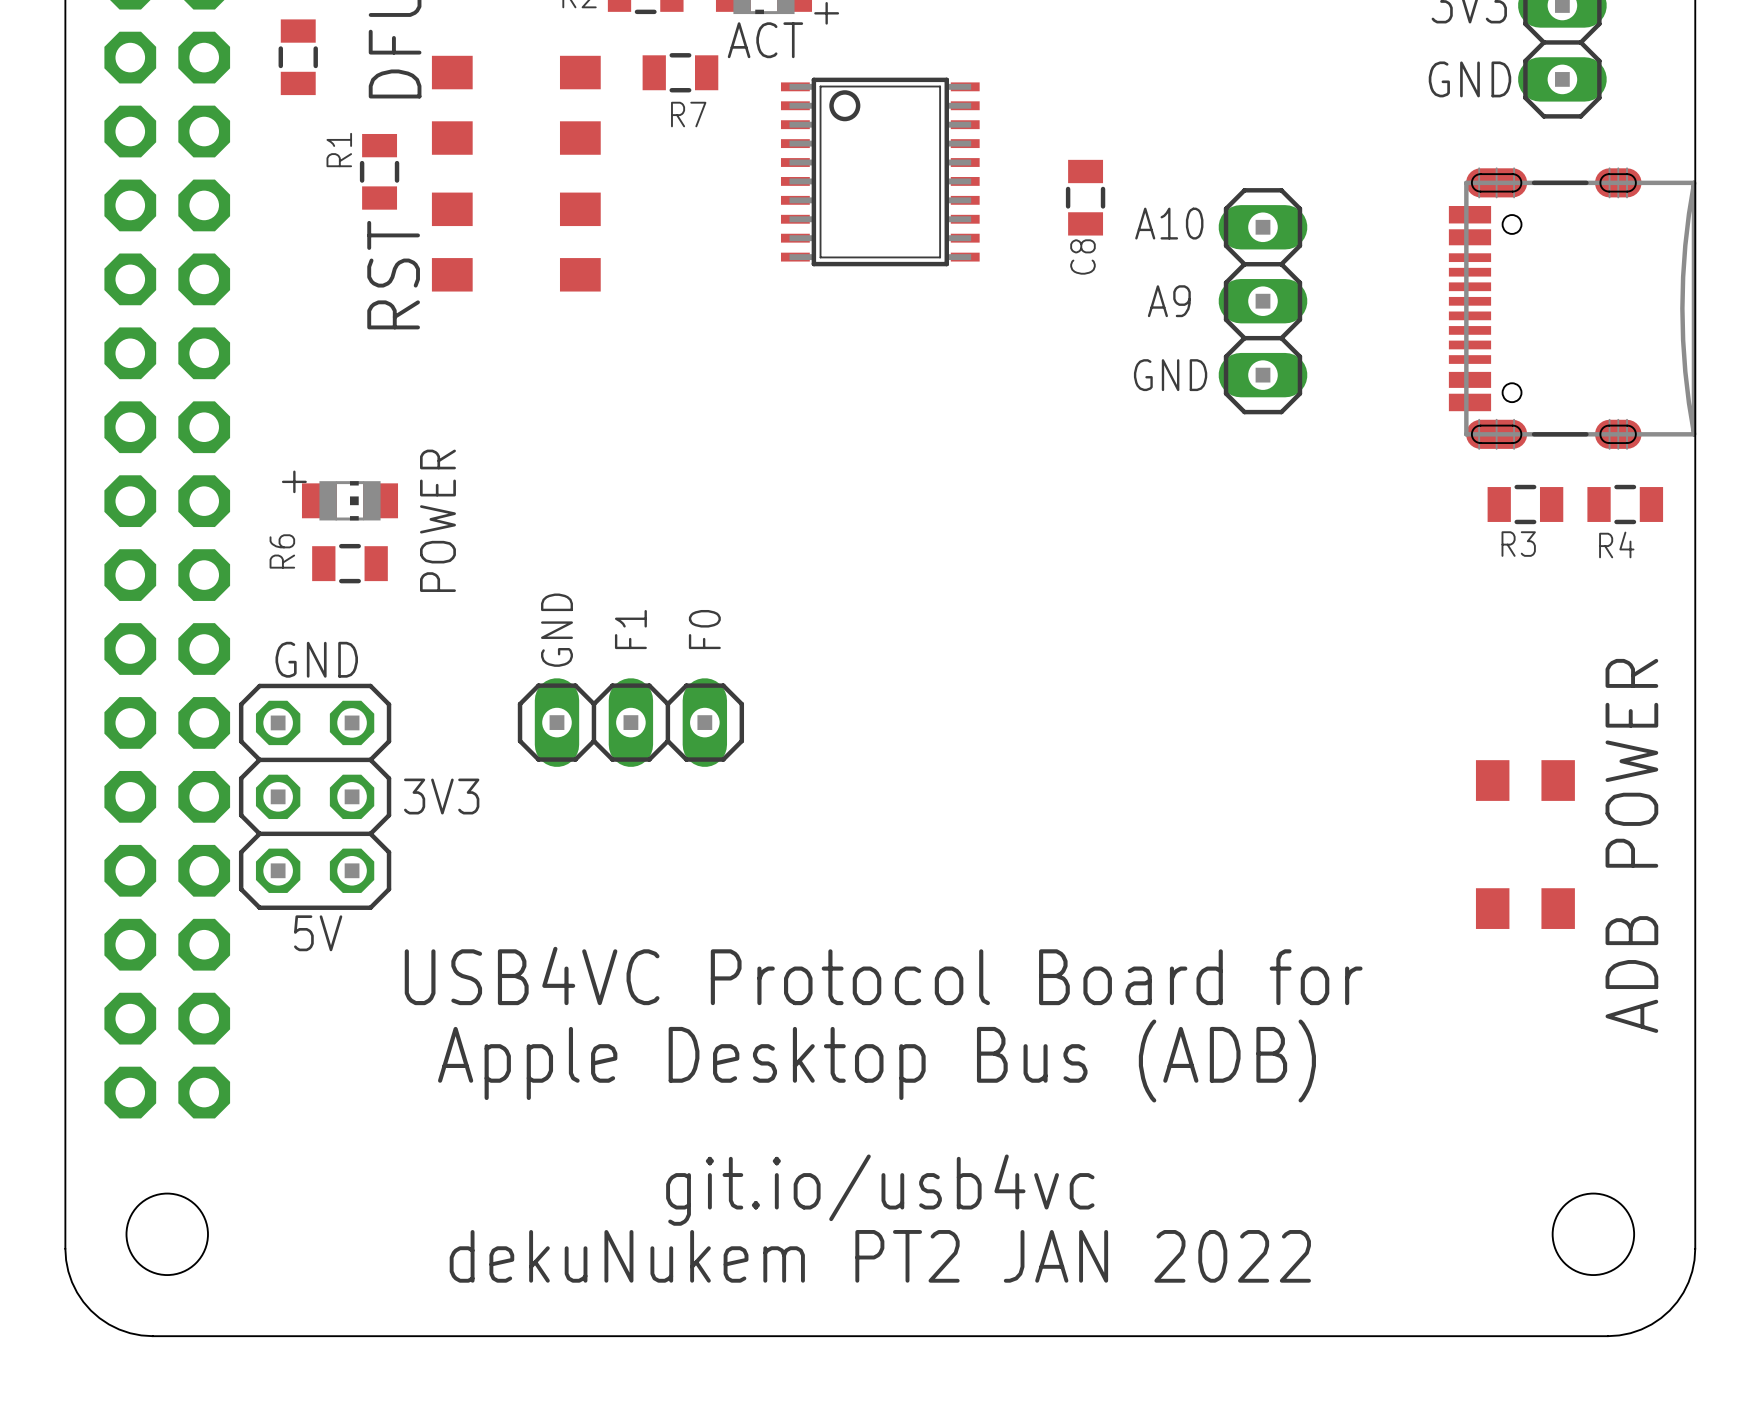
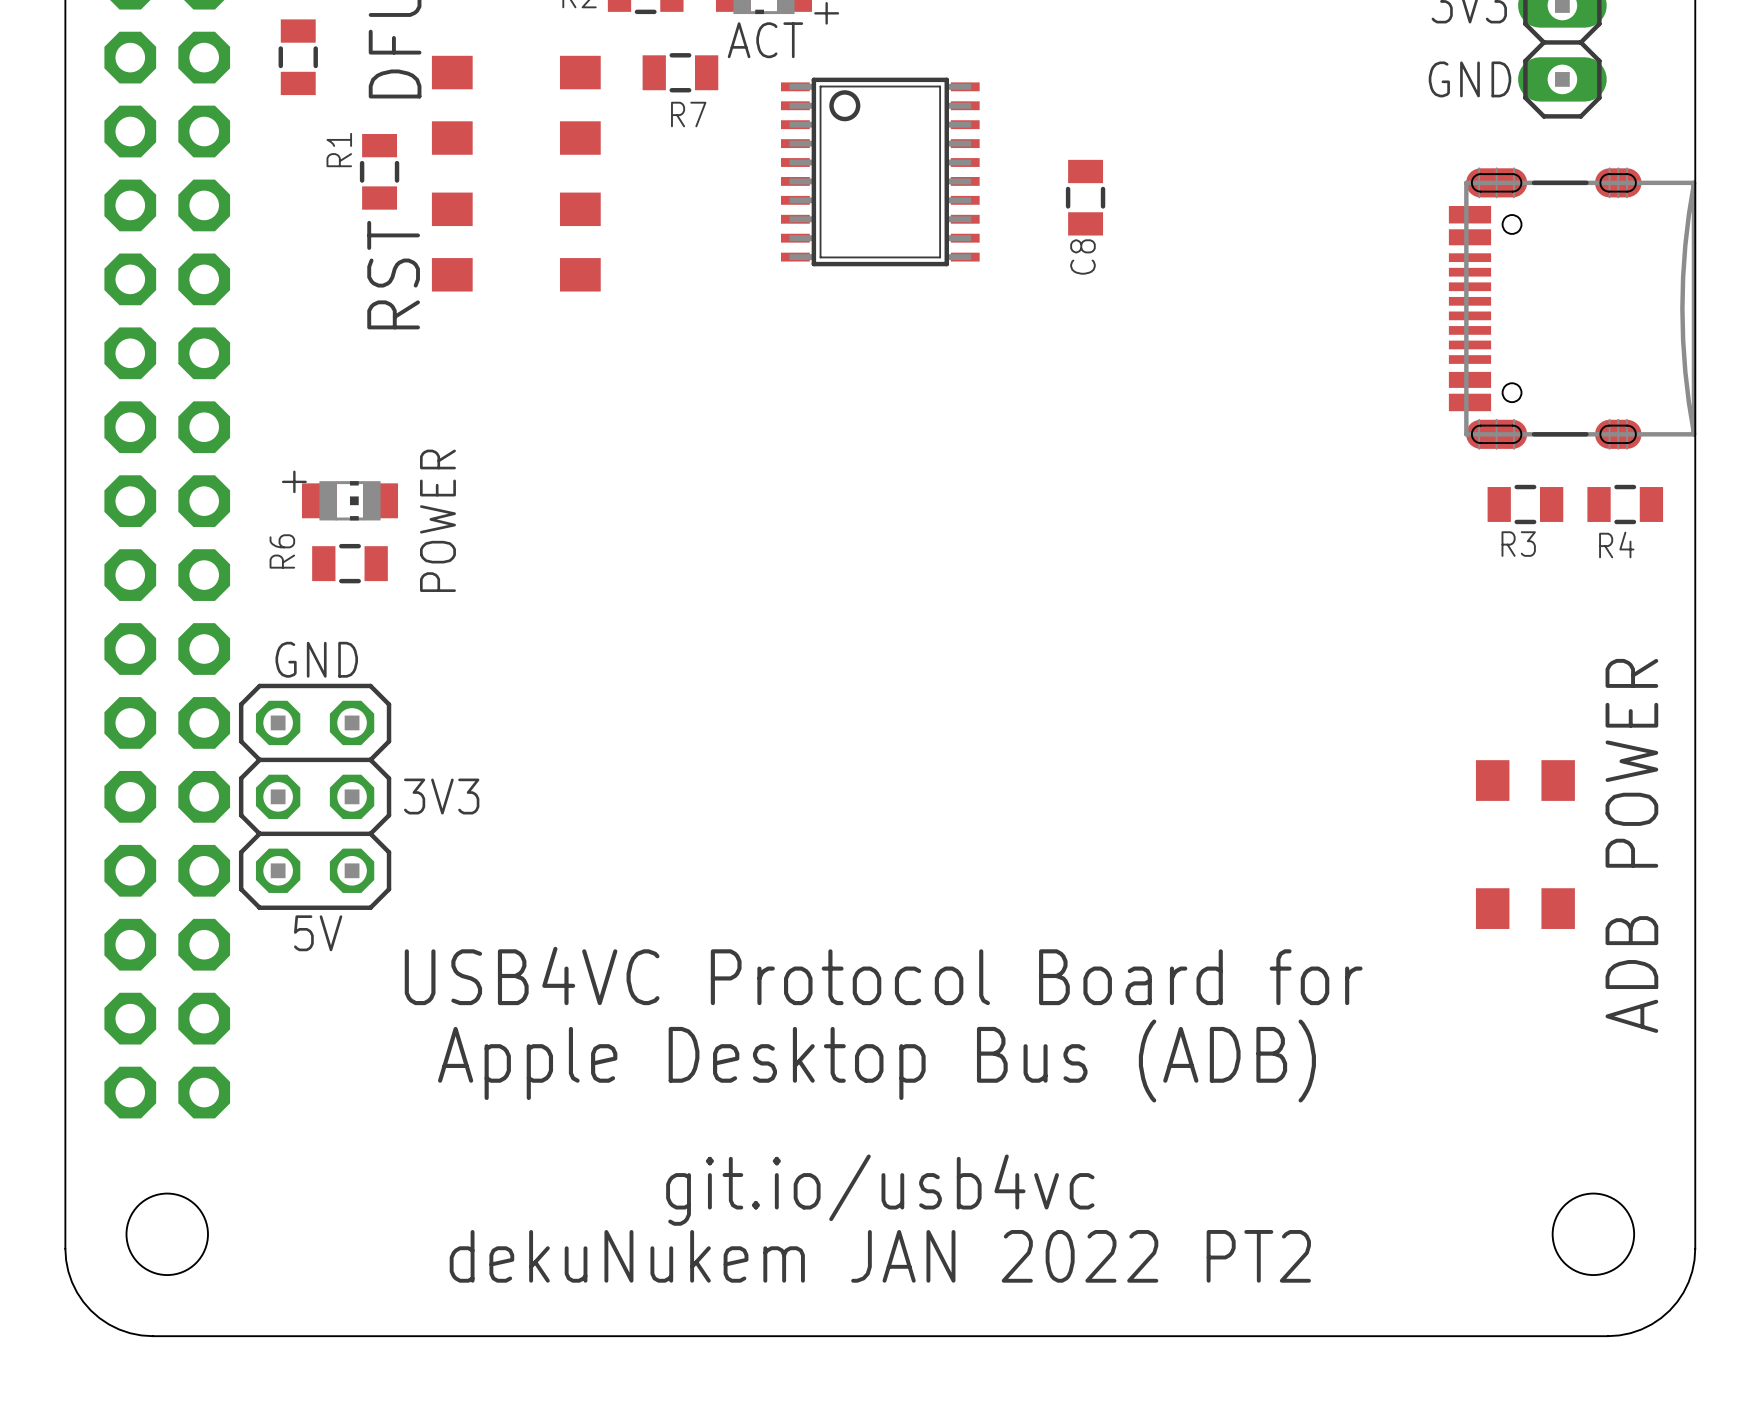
text: A10 (1169, 223) -> none
text: A9 (1169, 301) -> none
part: (1262, 301) -> none
text: GND (1170, 375) -> none
text: F1 (630, 629) -> none
text: F0 (704, 629) -> none
text: GND (556, 630) -> none
part: (630, 722) -> none
text: dekuNukem PT2 JAN 2022 (880, 1256) -> dekuNukem JAN 2022 PT2 (880, 1256)

